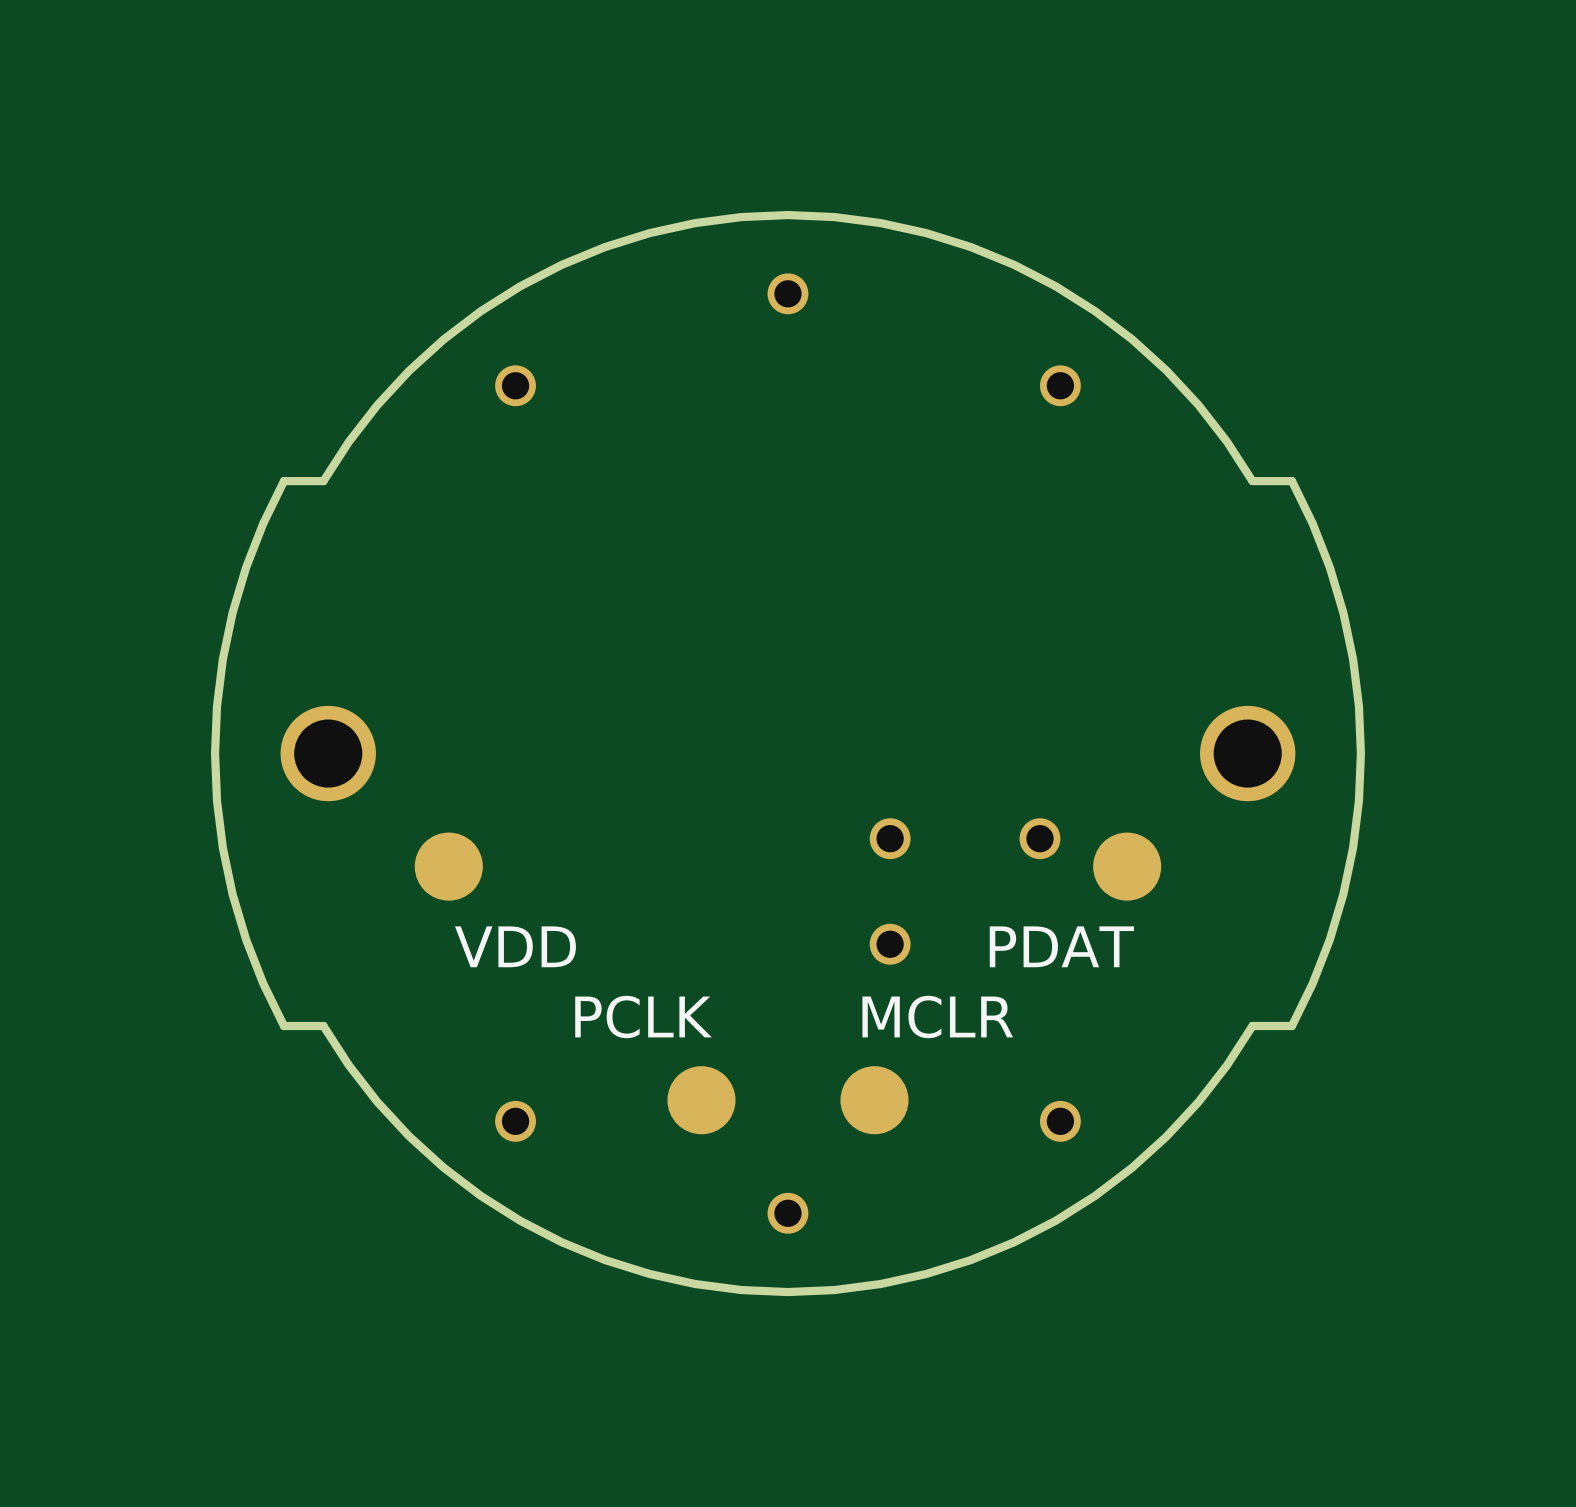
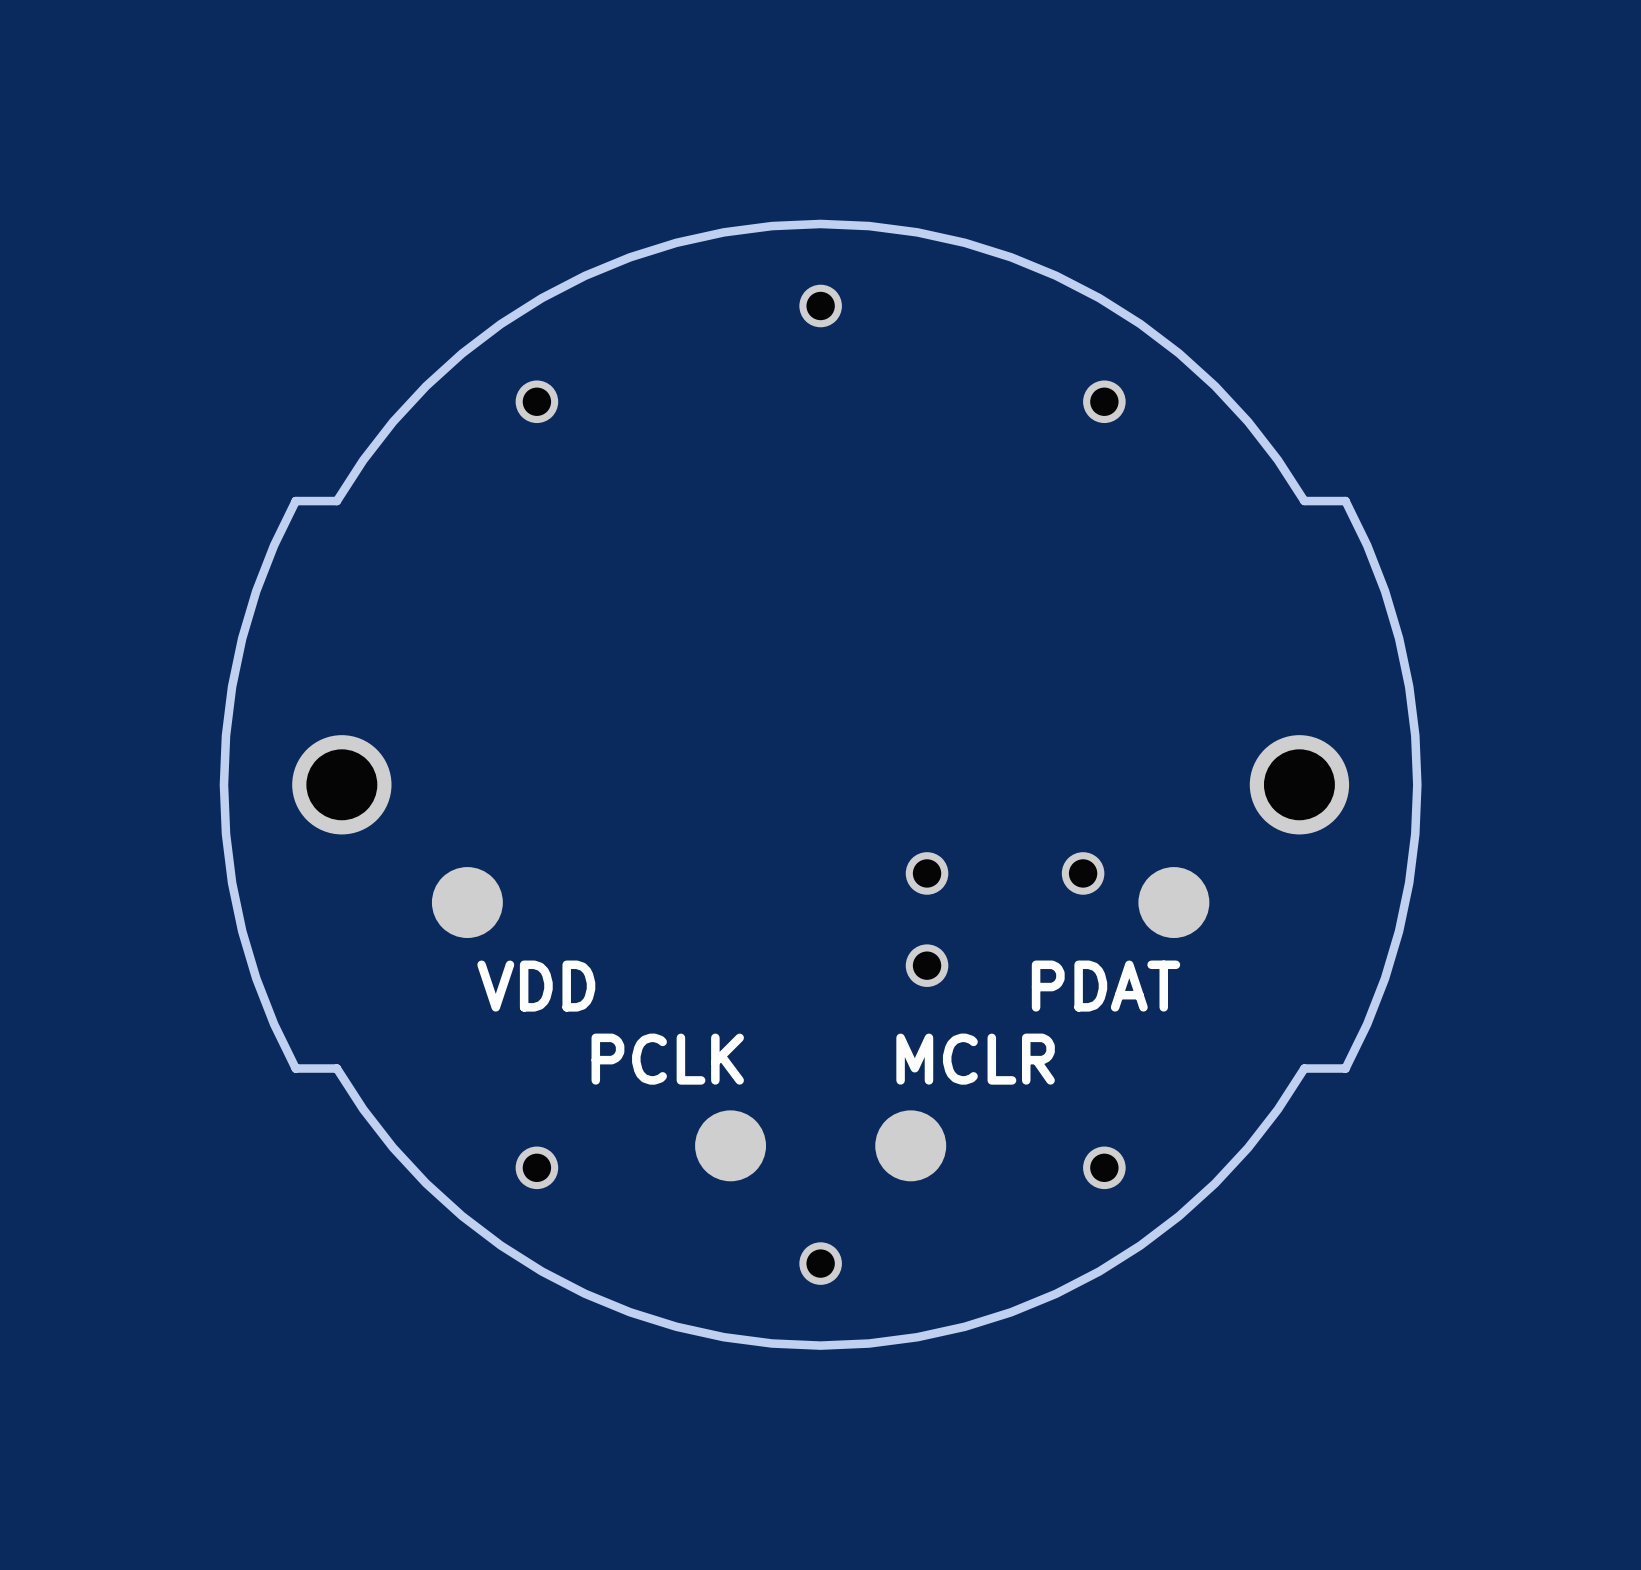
part position: (890, 944) -> (927, 965)

